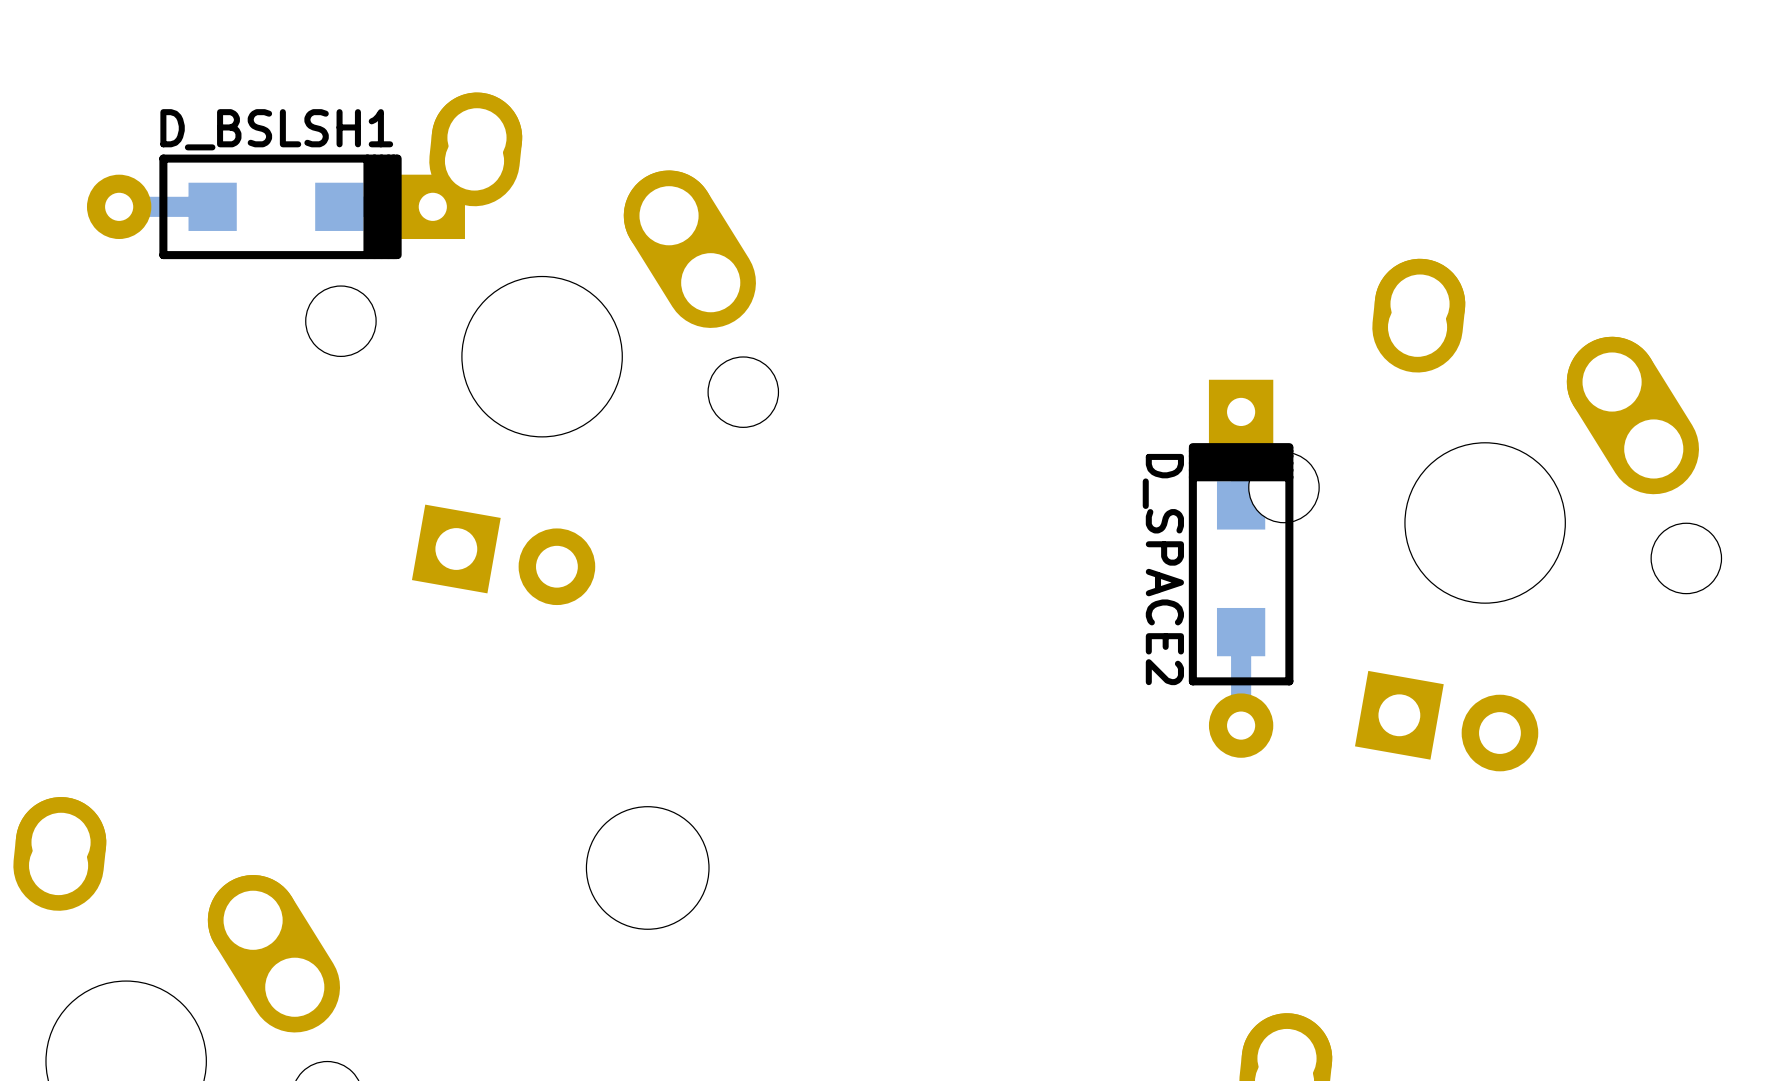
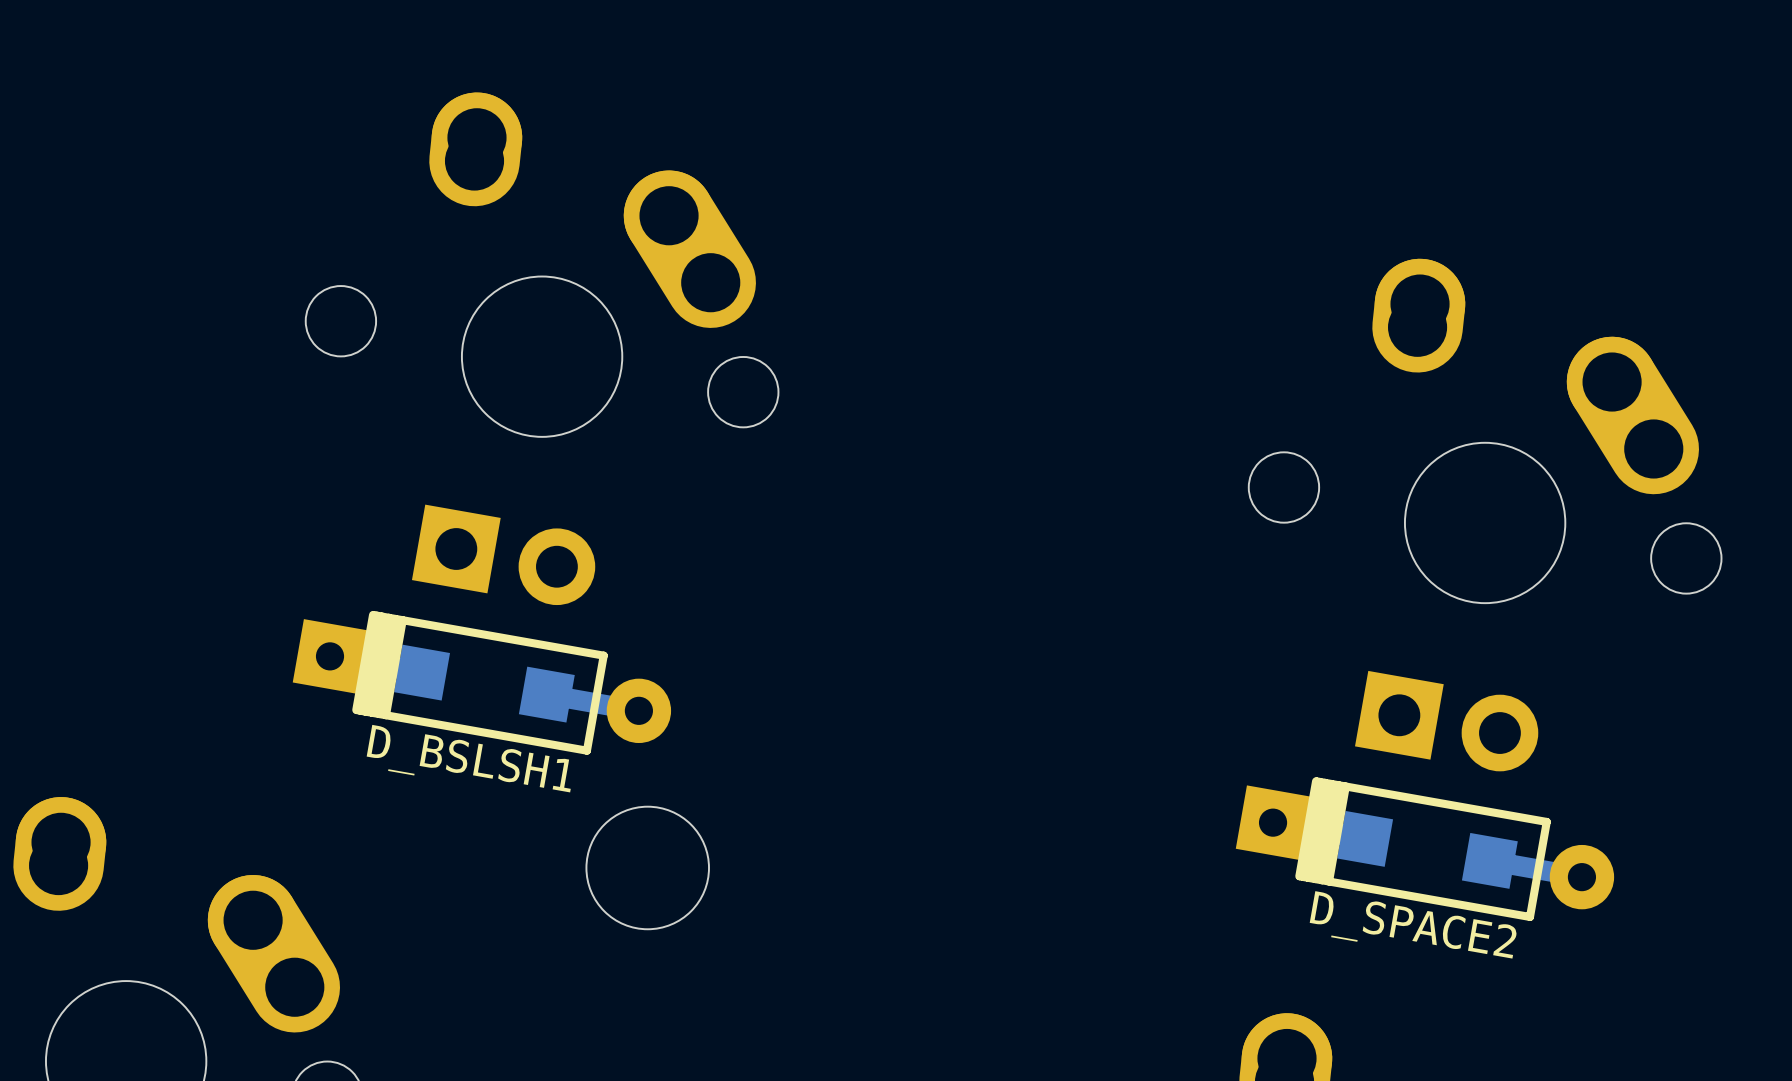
D_BSLSH1 rotation: 0° (275, 206) -> 170° counterclockwise (481, 682)
D_BSLSH1 position: (275, 206) -> (481, 682)
D_SPACE2 rotation: 0° (1241, 568) -> 80° counterclockwise (1424, 849)
D_SPACE2 position: (1241, 568) -> (1424, 849)

